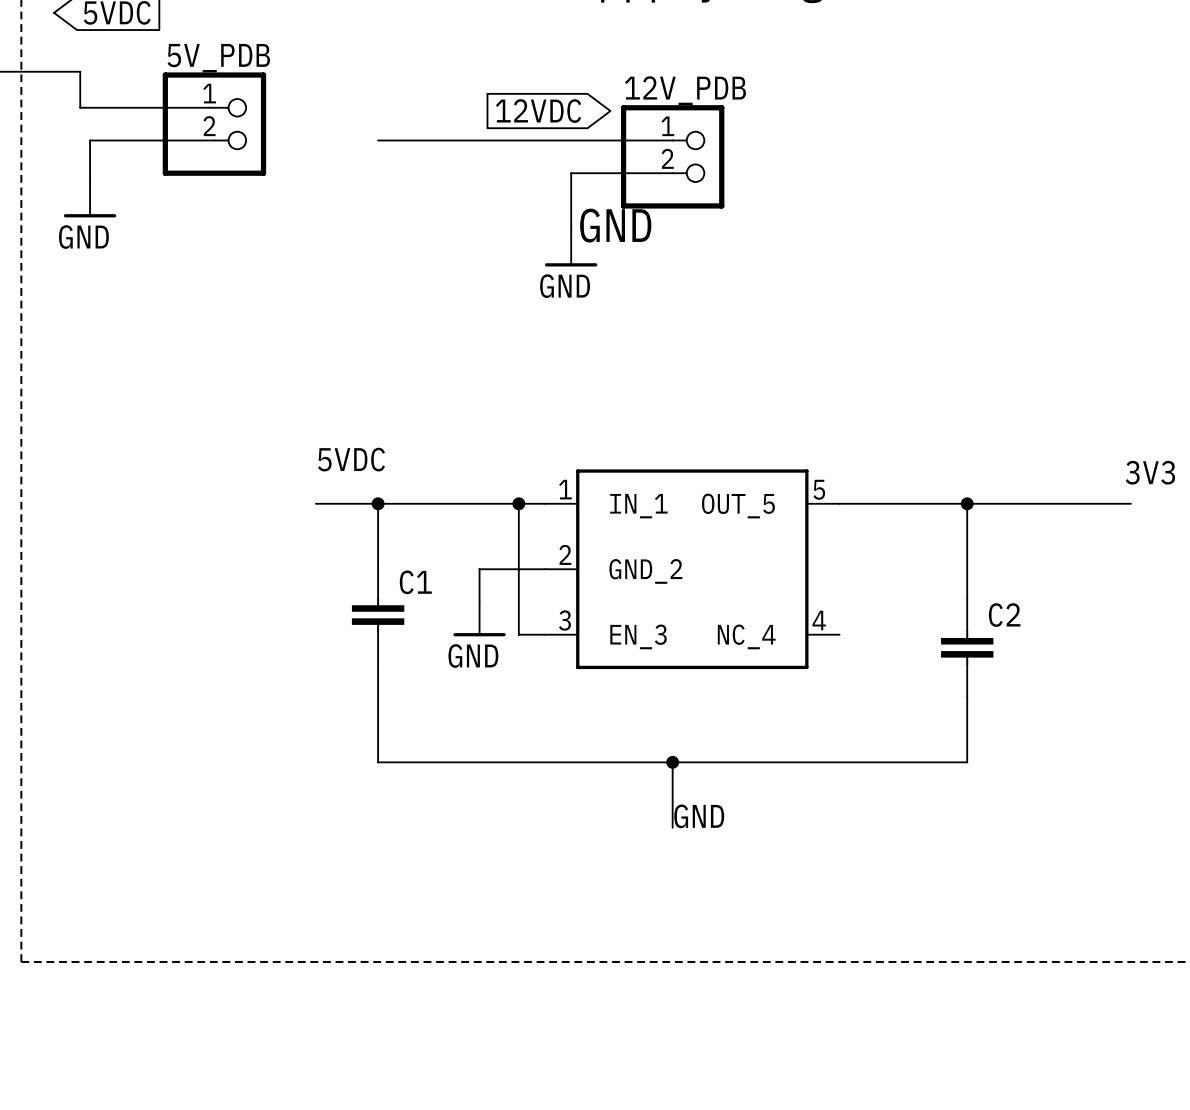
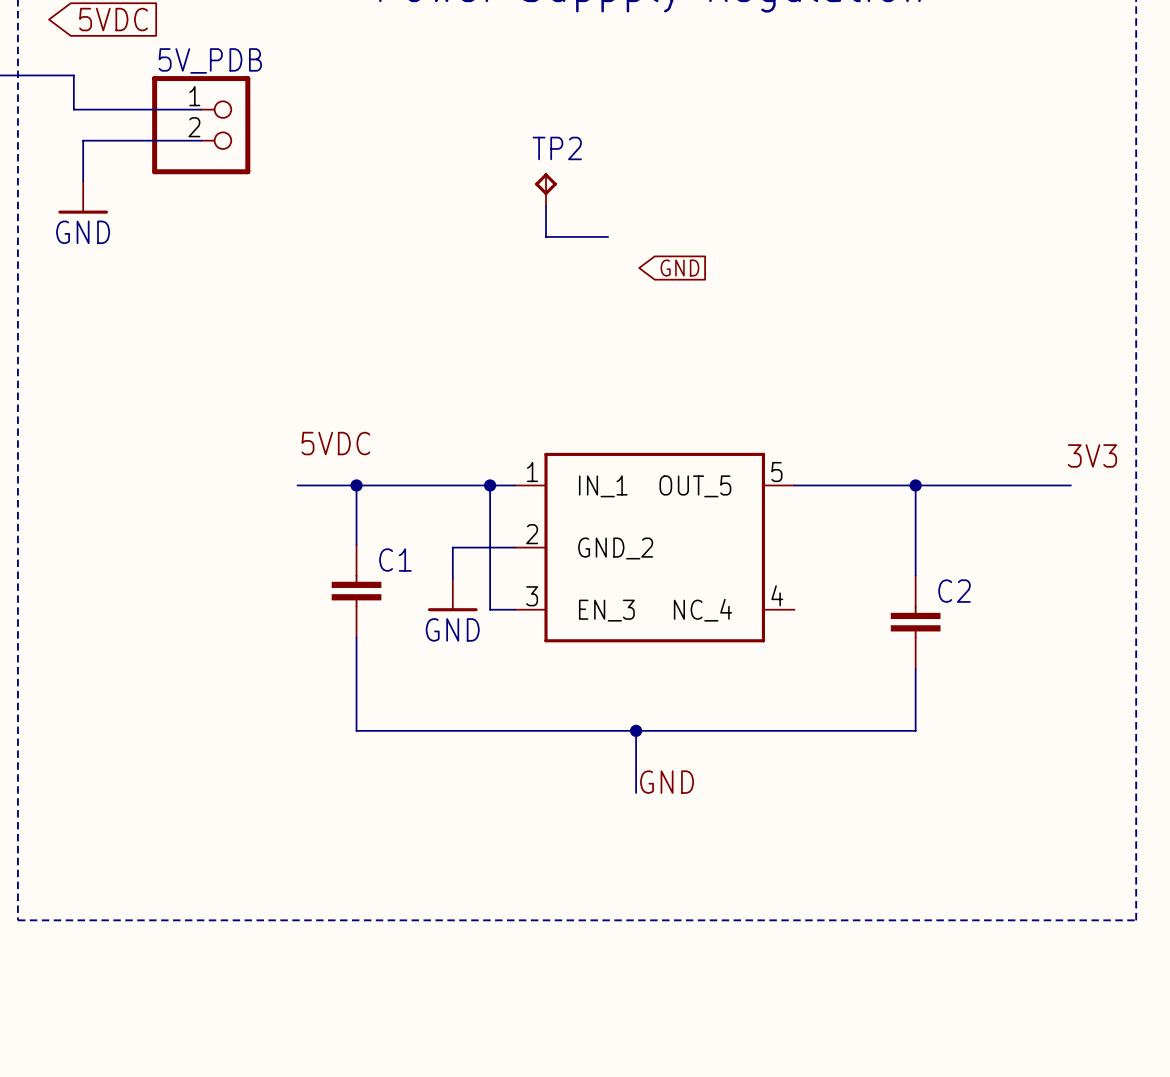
global label: 12VDC (538, 111) -> none
wire: (378, 140) (672, 140) -> none
12V_PDB: (672, 156) -> none
wire: (672, 173) (571, 173) (571, 232) -> none
TP2: none -> (546, 189)
wire: none -> (546, 205) (546, 236) (608, 236)
label: GND (615, 225) -> none
power symbol: GND (571, 249) -> none
global label: none -> GND (679, 268)

